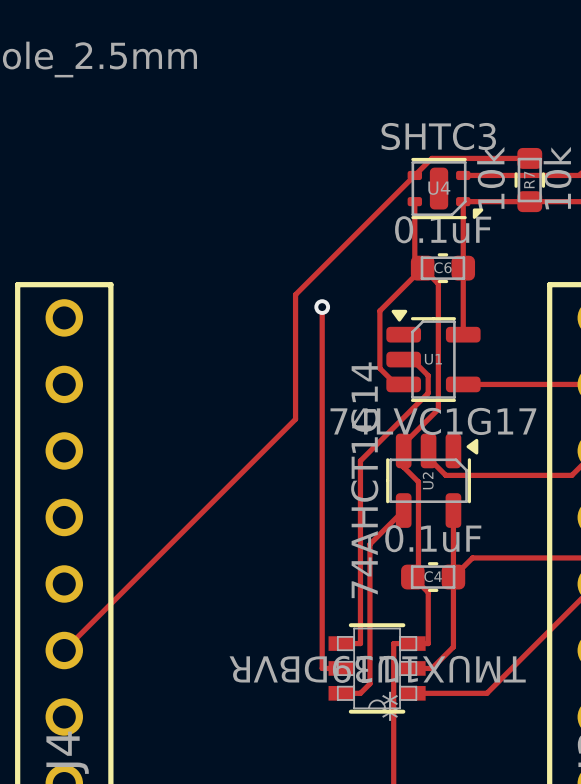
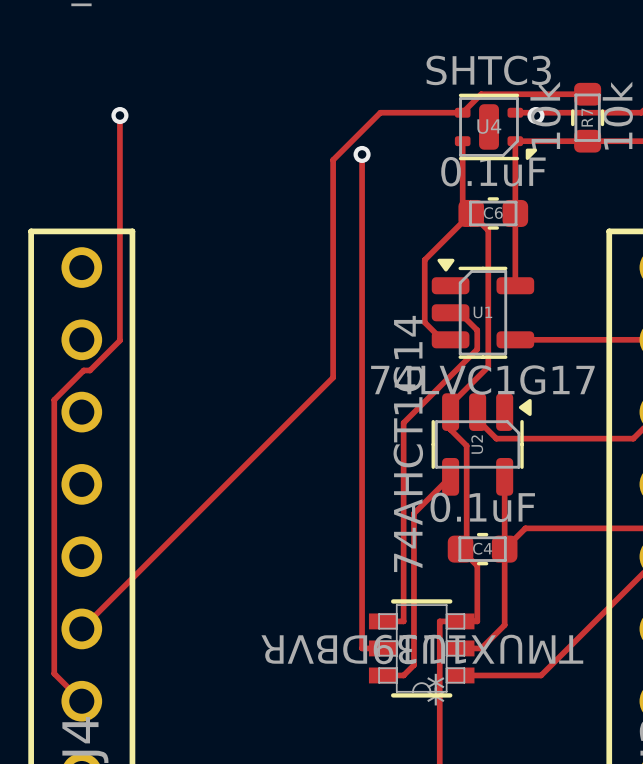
track: (414, 175) (295, 294) -> (462, 112) (380, 112) (333, 160) (333, 242)
track: none -> (119, 115) (119, 340) (90, 370) (83, 370) (54, 399) (54, 673) (81, 701)
via: none -> (119, 115)
via: none -> (535, 115)
track: none -> (362, 154) (362, 255)
via position: (322, 307) -> (362, 154)

